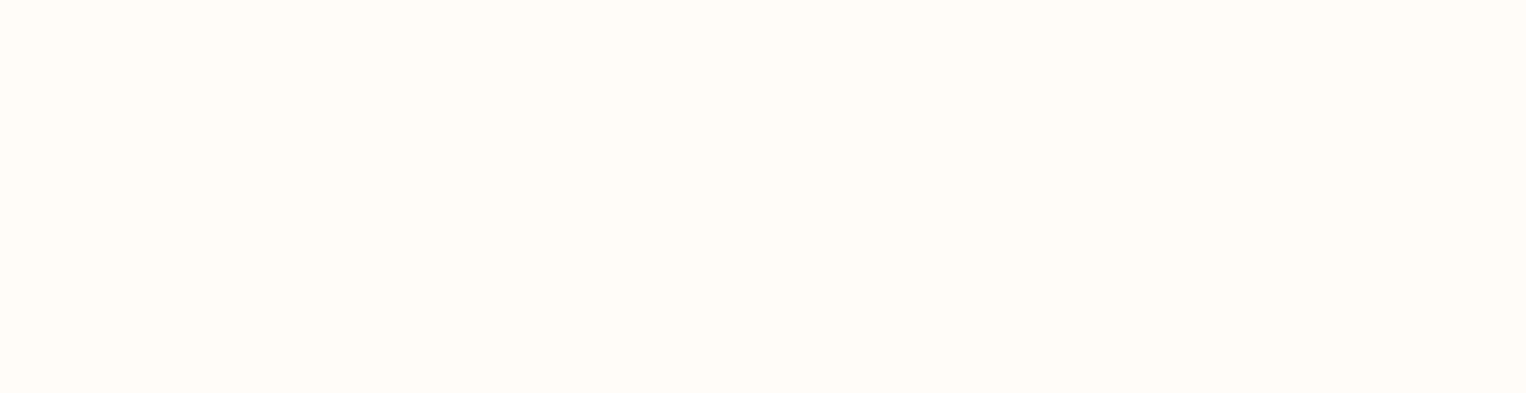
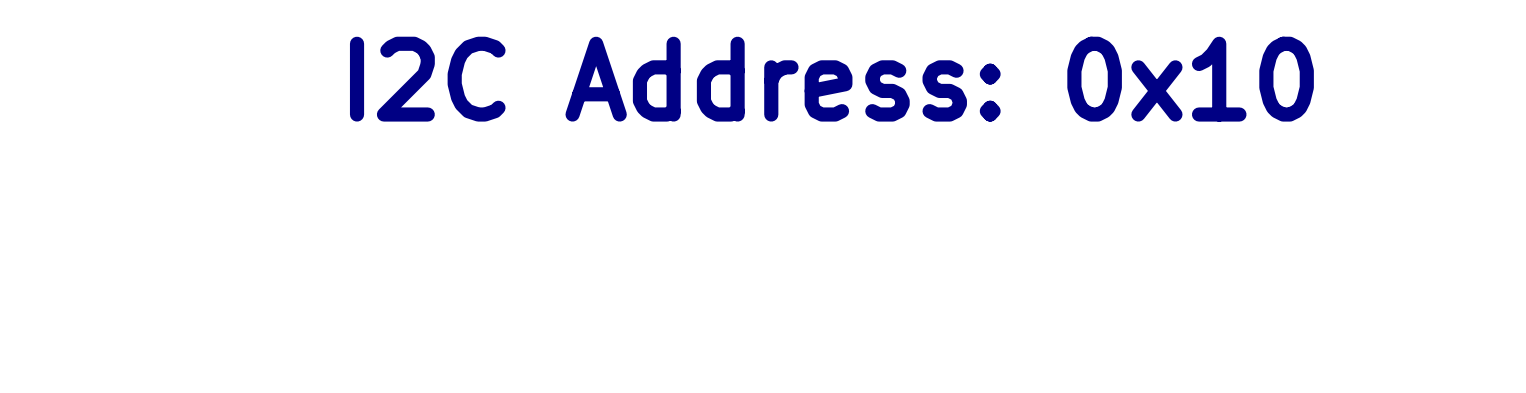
text: none -> I2C Address: 0x10 (831, 79)

